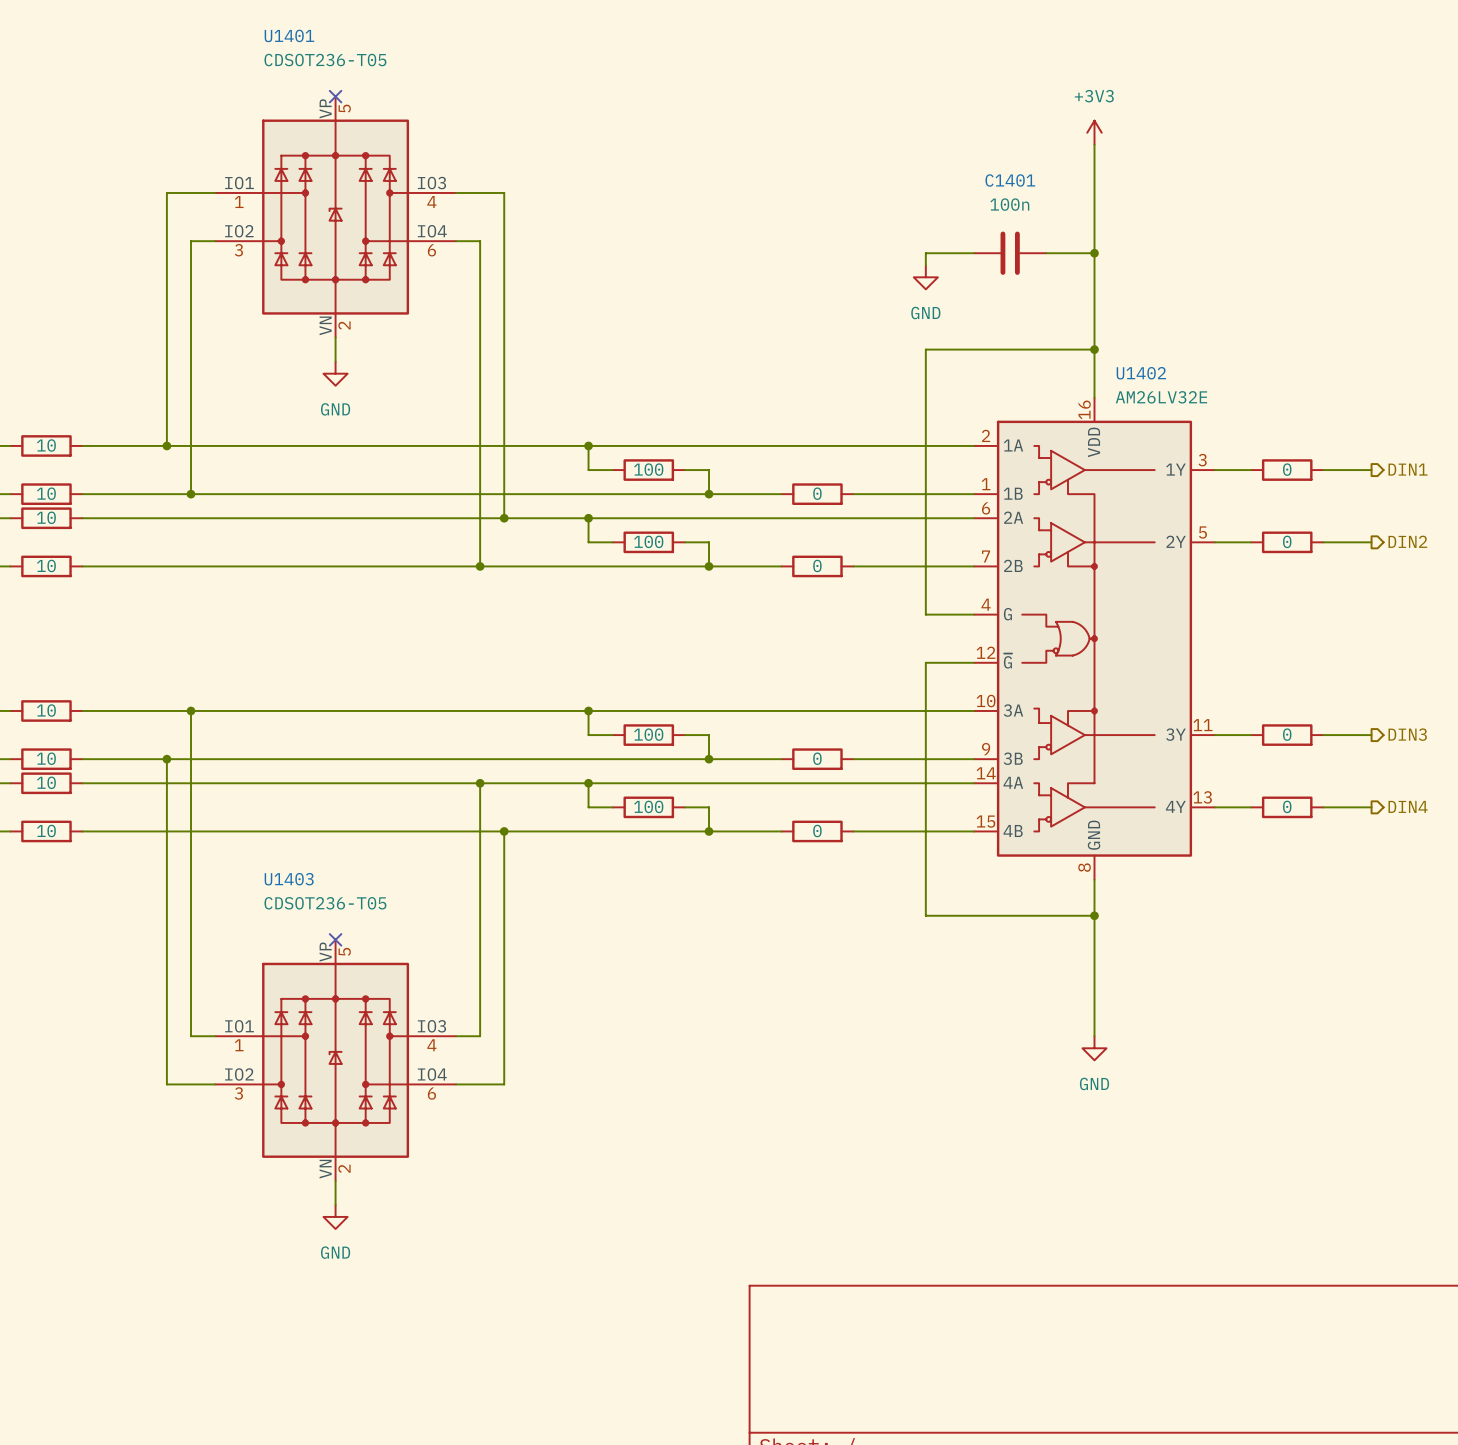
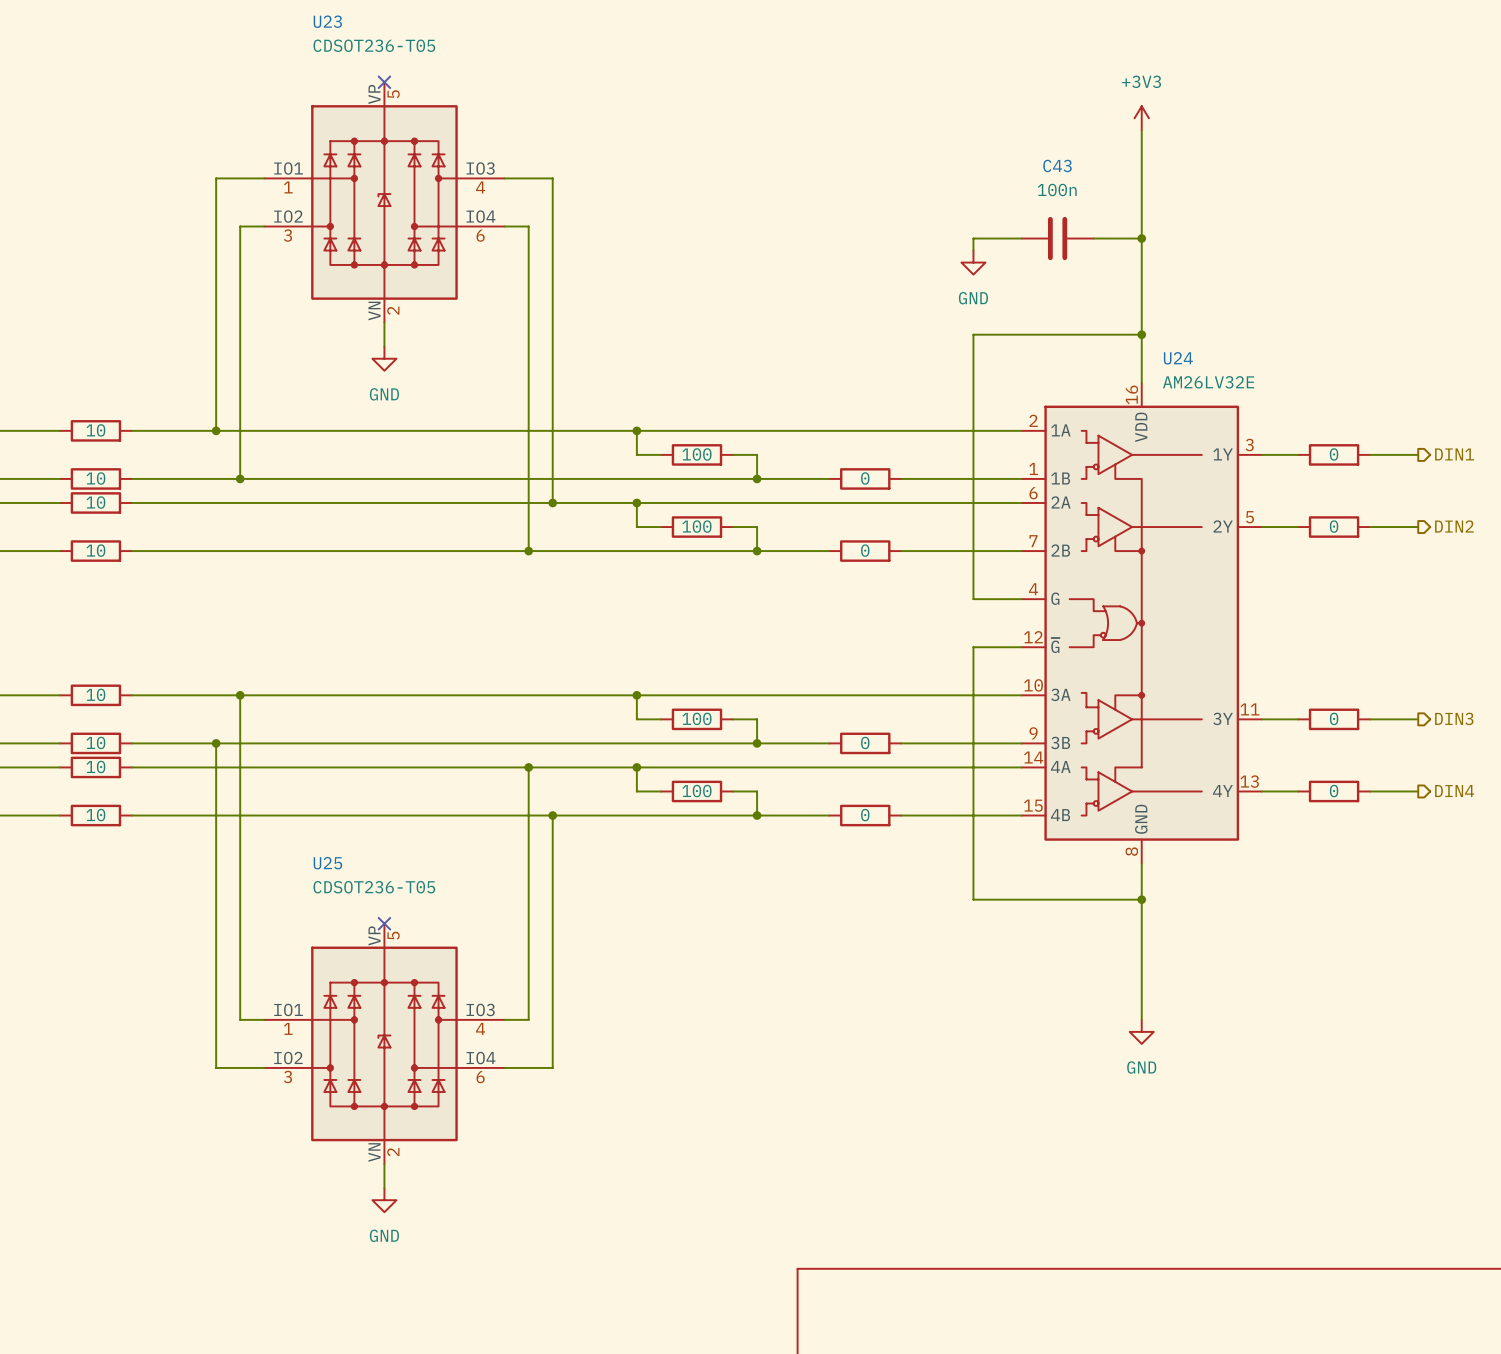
U1401 name: U1401 (289, 35) -> U23 (327, 21)
C1401 name: C1401 (1010, 180) -> C43 (1057, 165)
U1402 name: U1402 (1141, 373) -> U24 (1178, 358)
U1403 name: U1403 (289, 879) -> U25 (327, 863)

